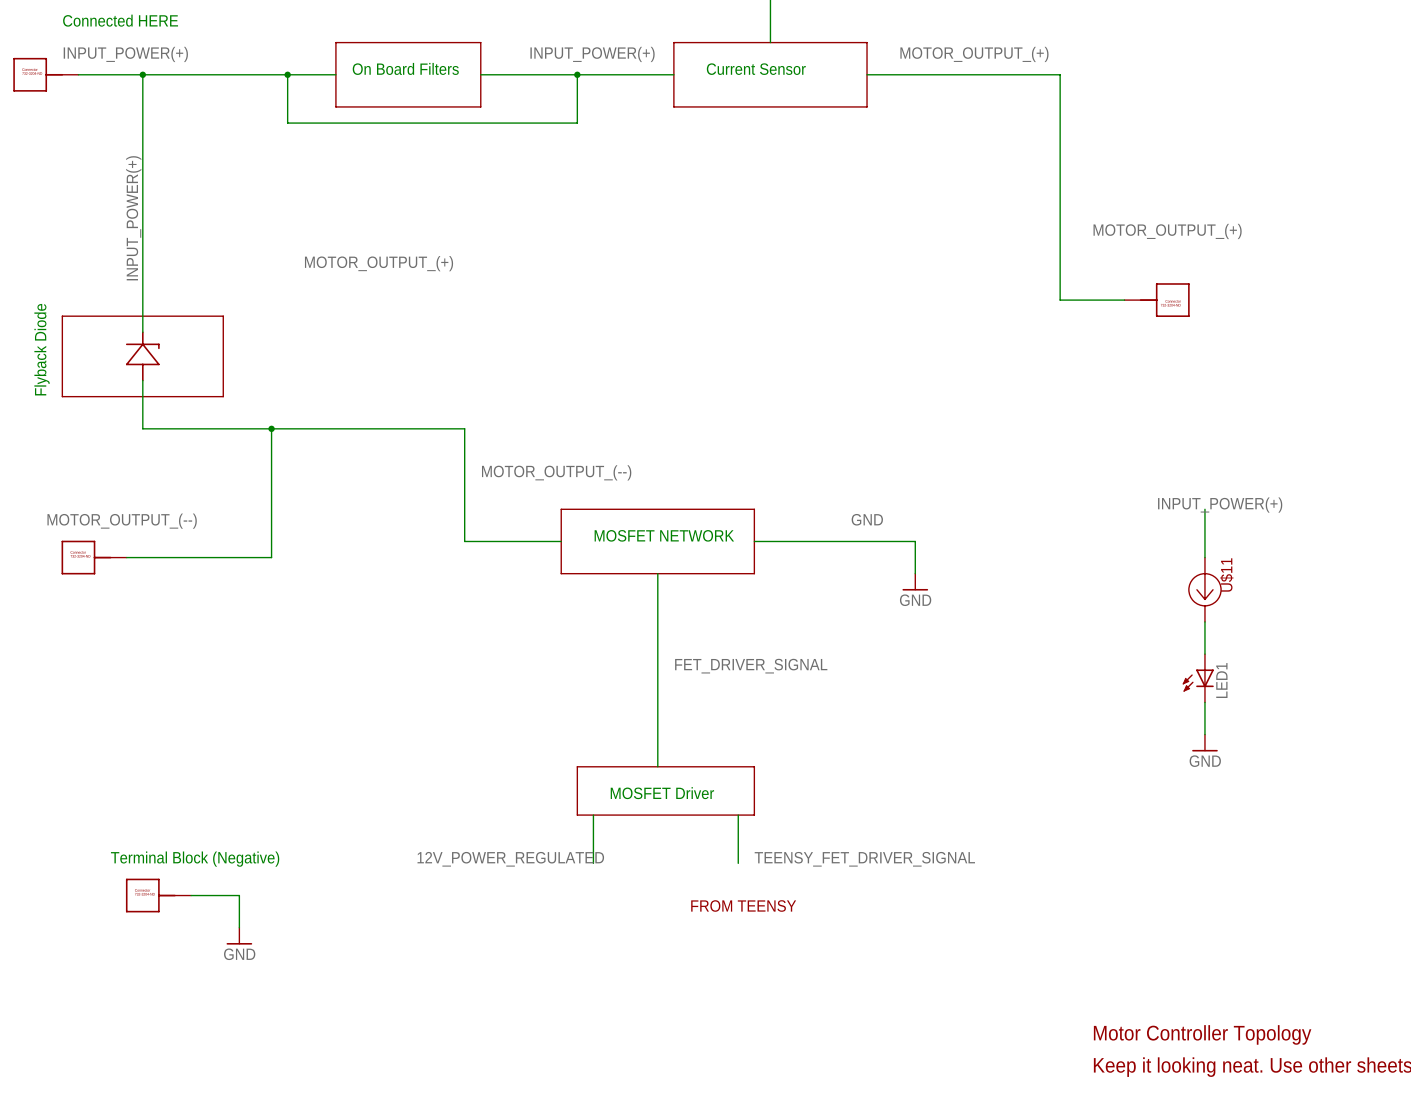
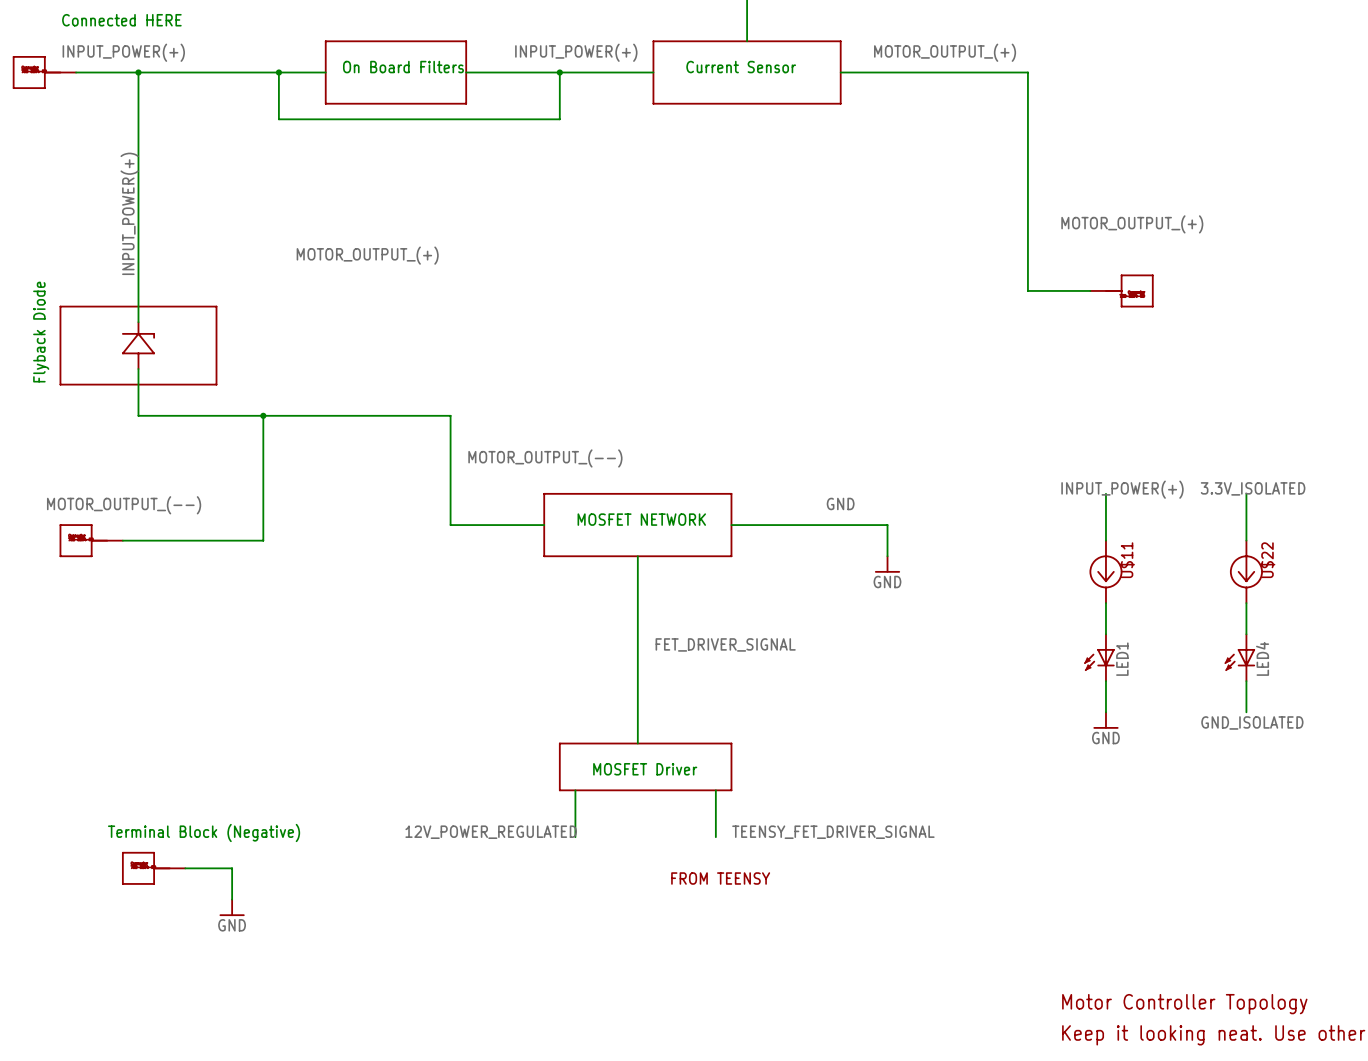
label position: INPUT_POWER(+) (1220, 505) -> INPUT_POWER(+) (1122, 489)
label: none -> 3.3V_ISOLATED (1253, 488)
wire: (1204, 509) (1204, 557) -> (1105, 493) (1105, 540)
wire: none -> (1246, 493) (1246, 540)
U$11 position: (1204, 589) -> (1105, 571)
U$22: none -> (1246, 571)
wire: (1204, 621) (1204, 654) -> (1105, 603) (1105, 634)
wire: none -> (1246, 603) (1246, 634)
LED1 position: (1198, 678) -> (1099, 657)
LED4: none -> (1239, 657)
wire: (1204, 702) (1204, 734) -> (1105, 681) (1105, 712)
wire: none -> (1246, 681) (1246, 712)
power symbol position: GND (1204, 743) -> GND (1105, 720)
label: none -> GND_ISOLATED (1252, 722)

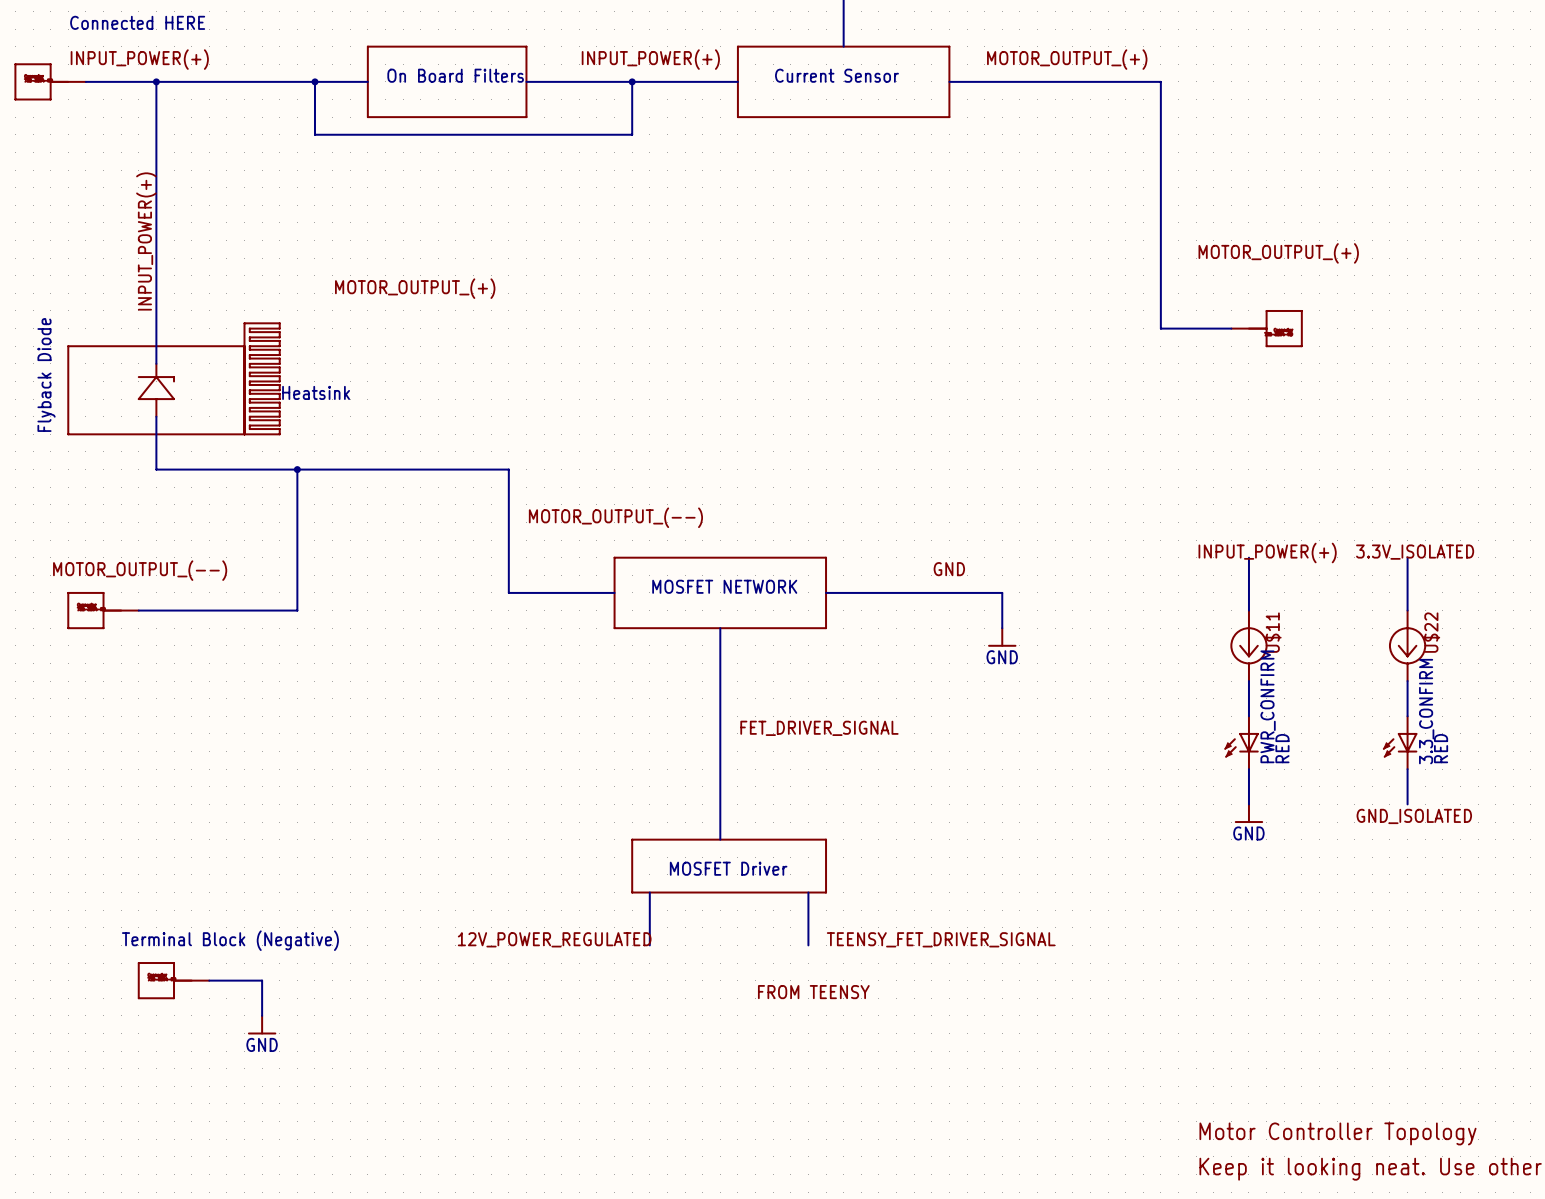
part: none -> (262, 378)
text: none -> Heatsink (316, 392)
LED4 name: LED4 (1262, 658) -> 3.3_CONFIRM (1426, 711)
LED1 name: LED1 (1122, 659) -> PWR_CONFIRM (1268, 706)
LED1 value: none -> RED (1282, 748)
LED4 value: none -> RED (1441, 748)

